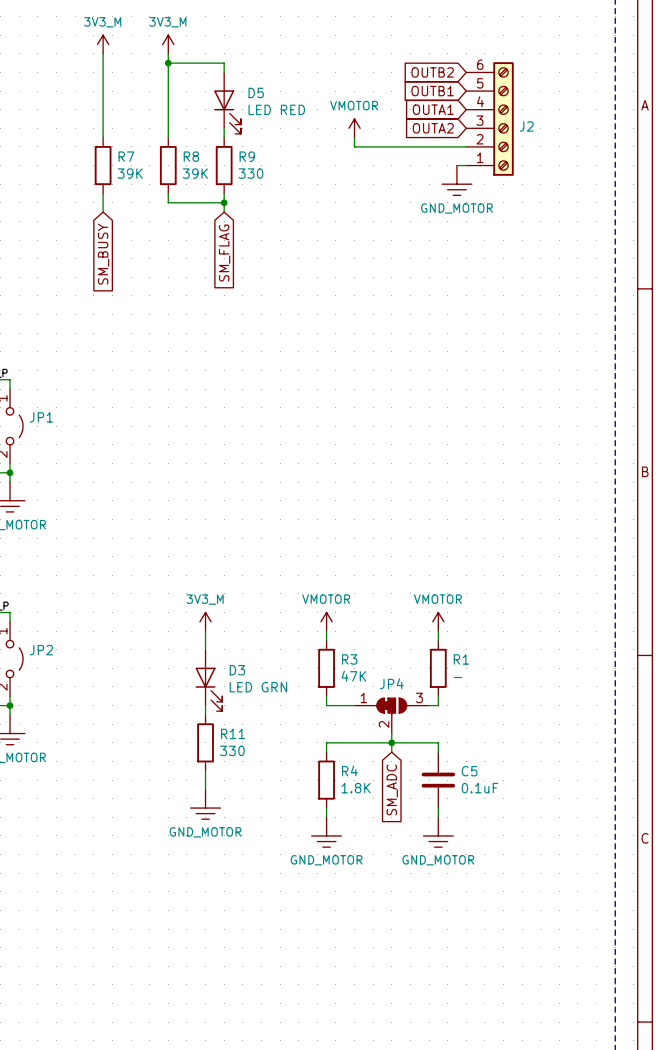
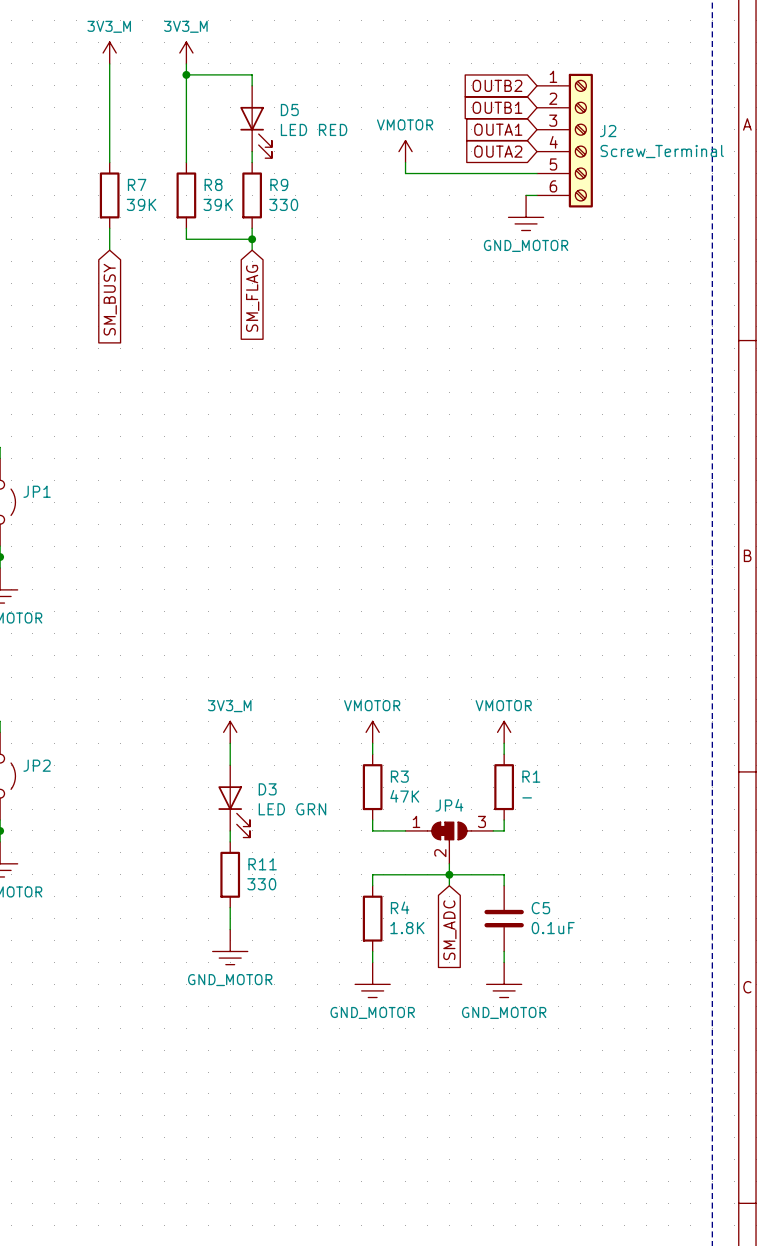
J2 flip: as is (503, 118) -> up-down (580, 140)
J2 value: none -> Screw_Terminal (662, 151)

